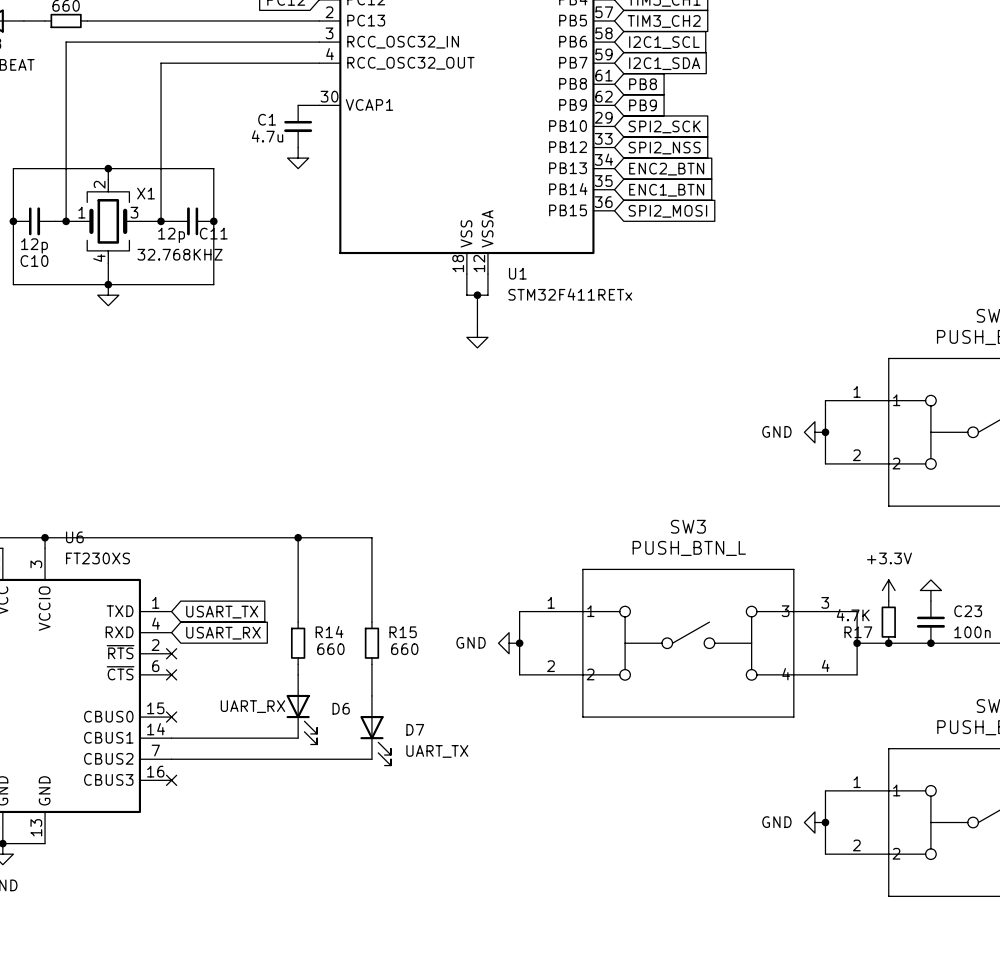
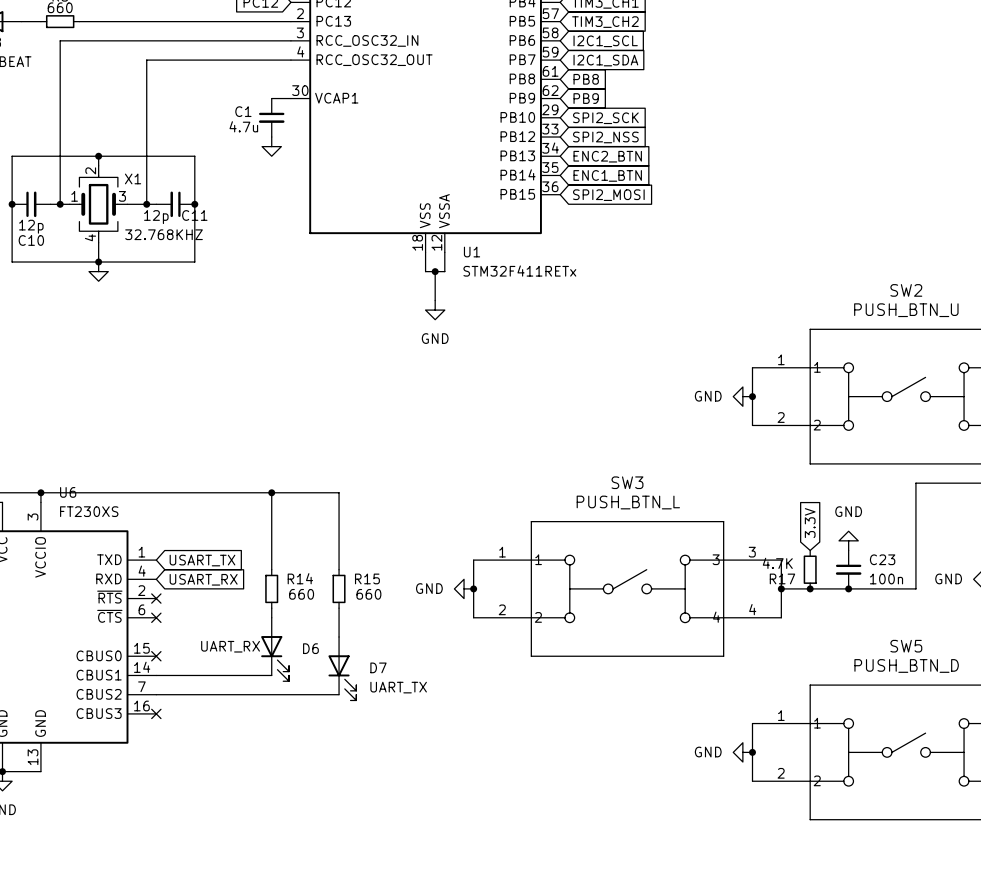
power symbol text: none -> GND (435, 338)
power symbol text: none -> GND (848, 511)
global label: none -> 3.3V (810, 523)
power symbol: +3.3V (888, 590) -> none

